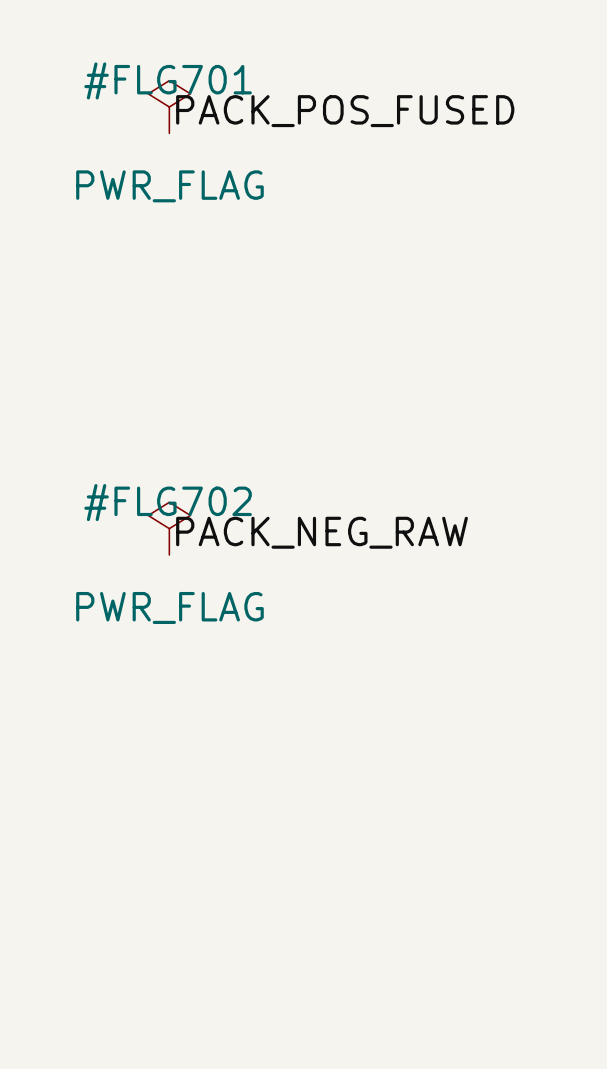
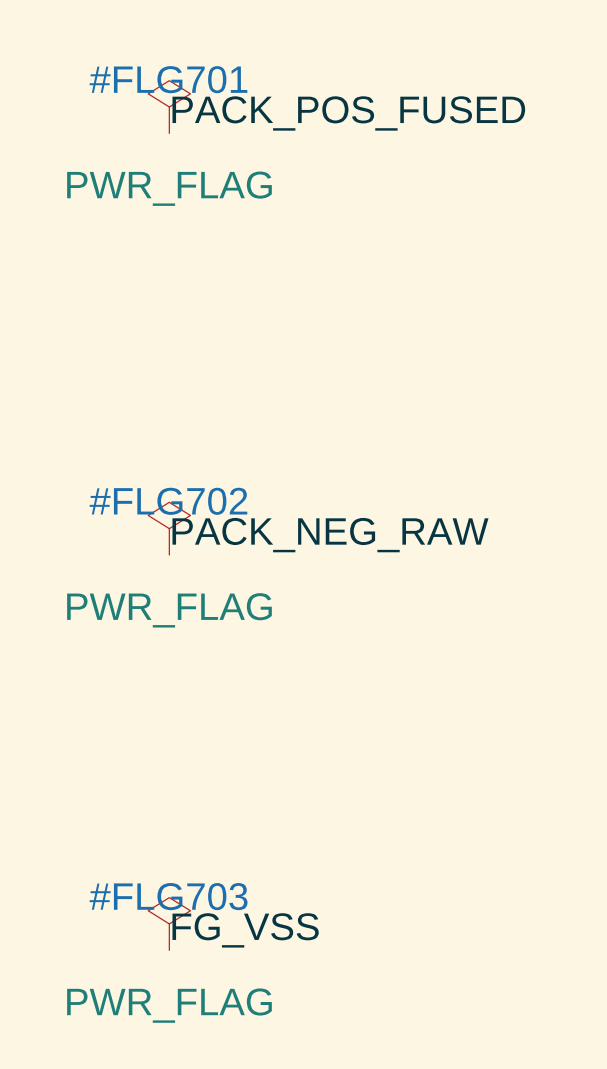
#FLG703: none -> PWR_FLAG (169, 923)
label: none -> FG_VSS (245, 930)

